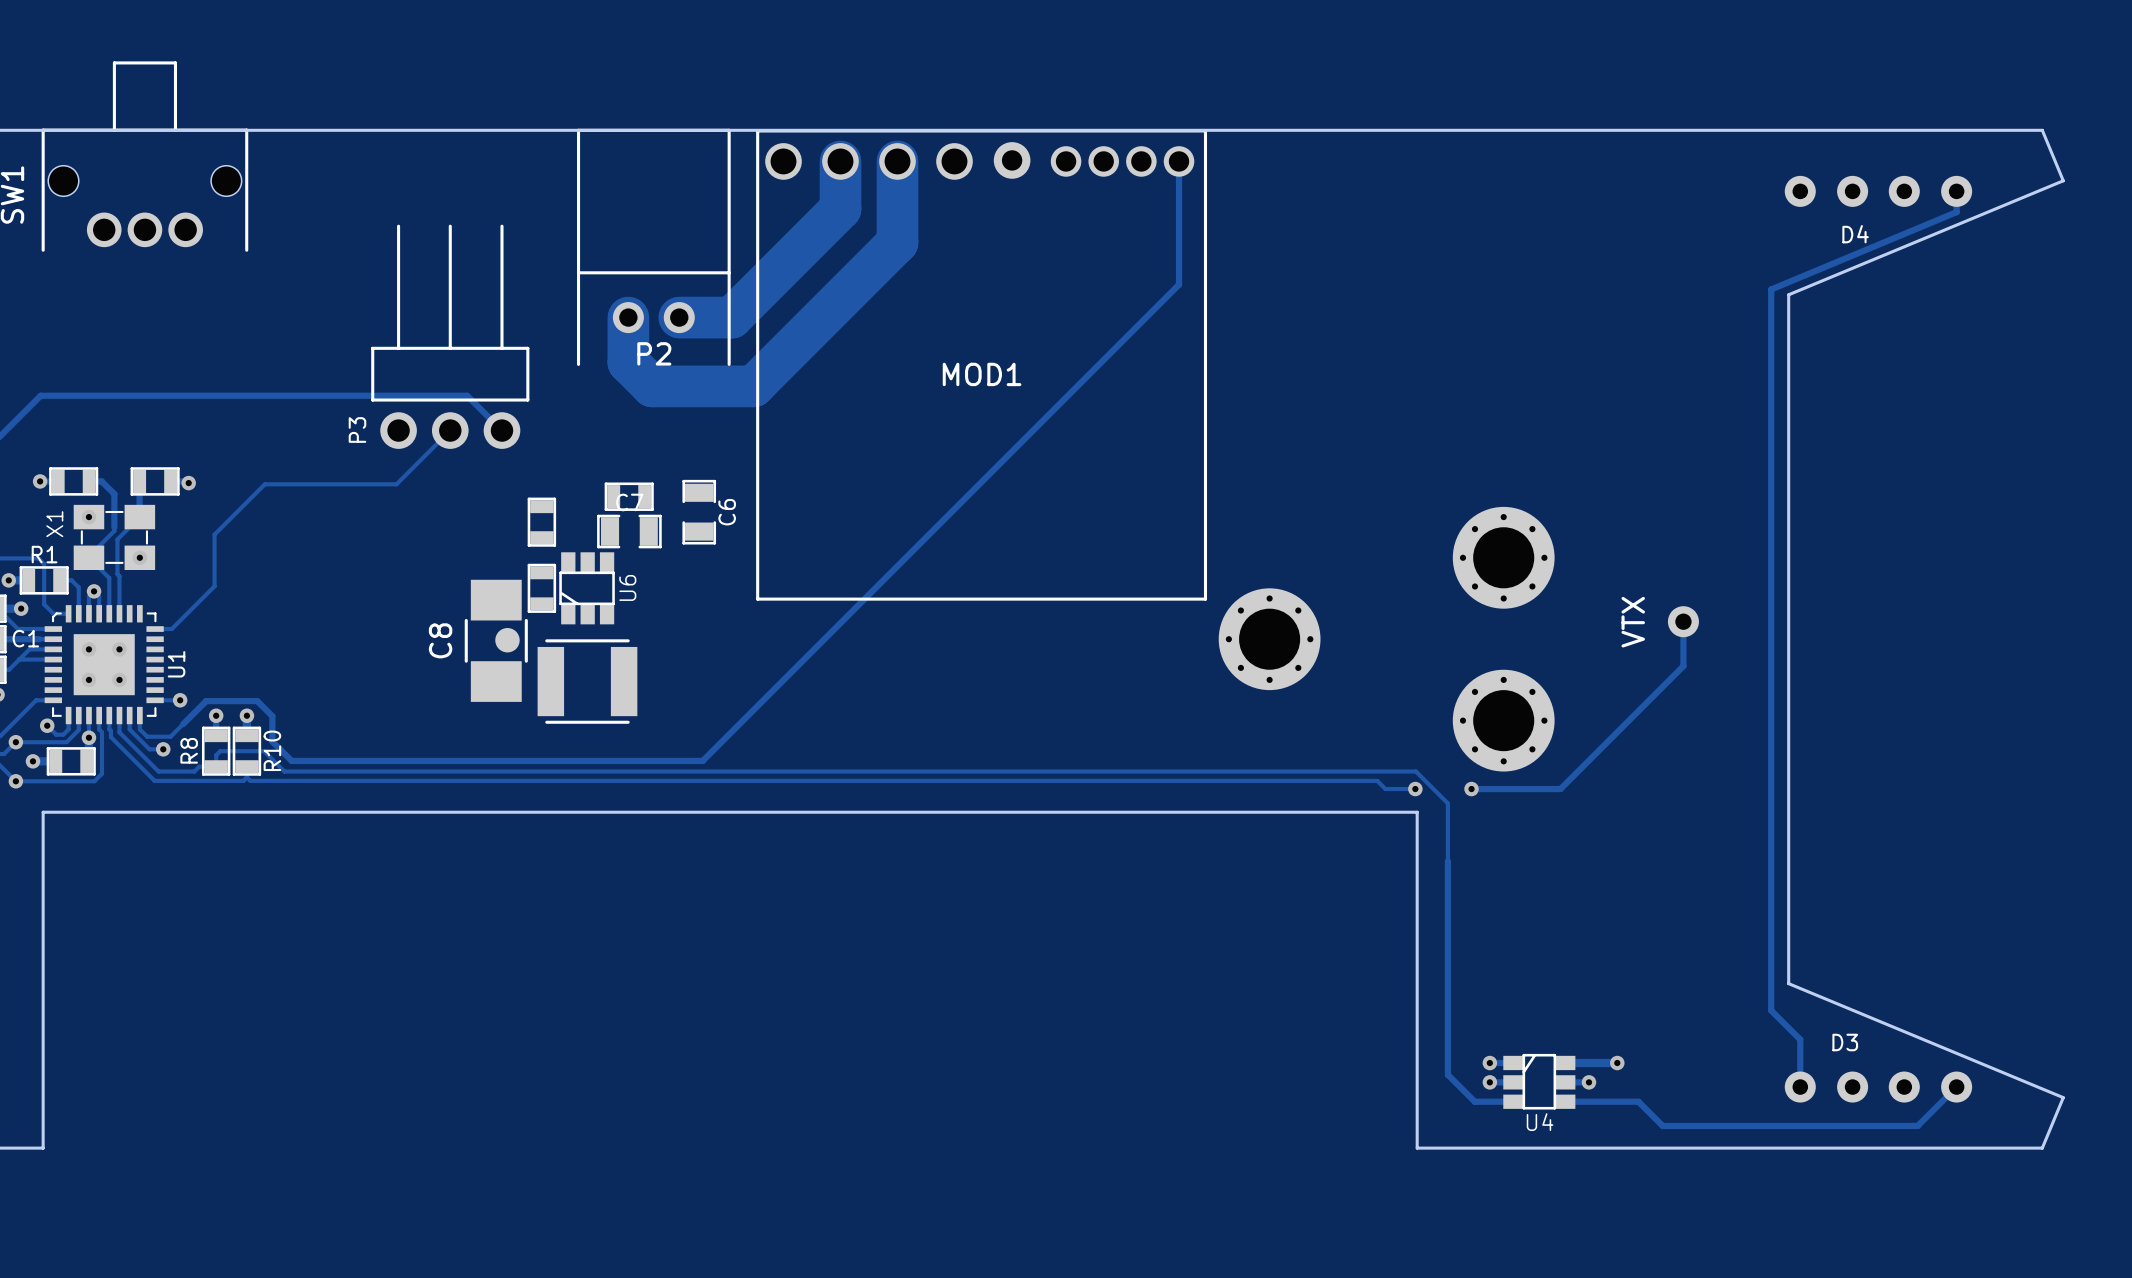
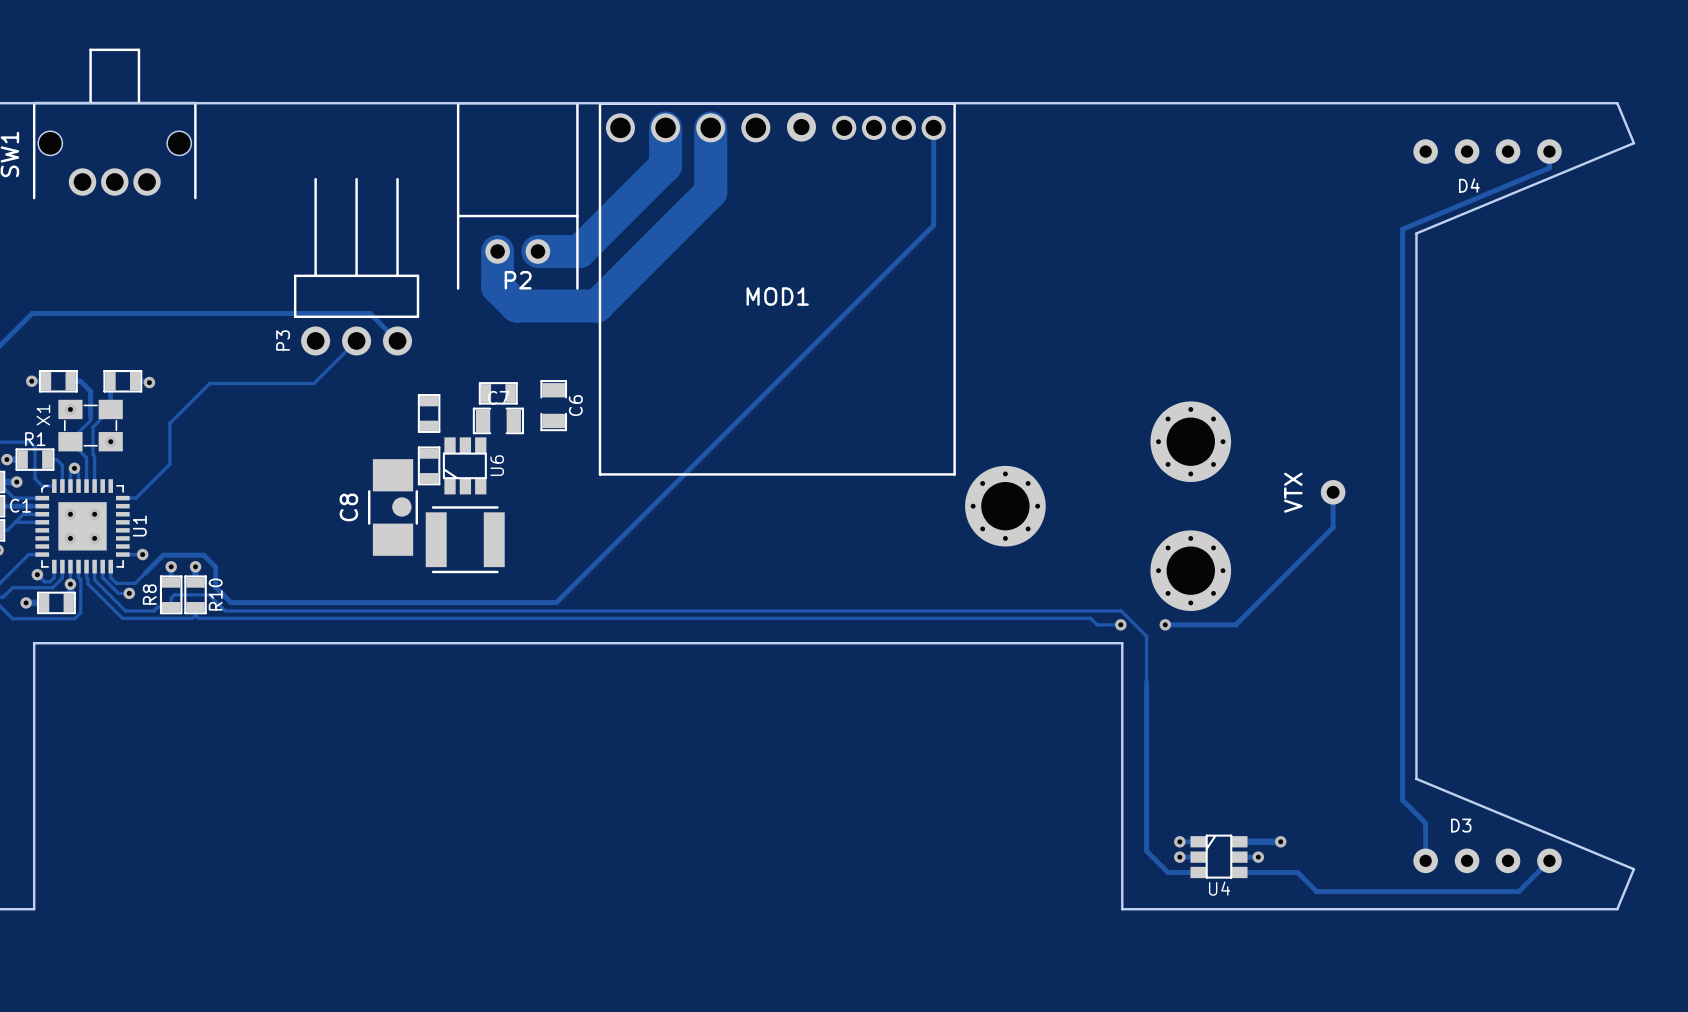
via: (15, 742) -> none
via: (15, 781) -> none

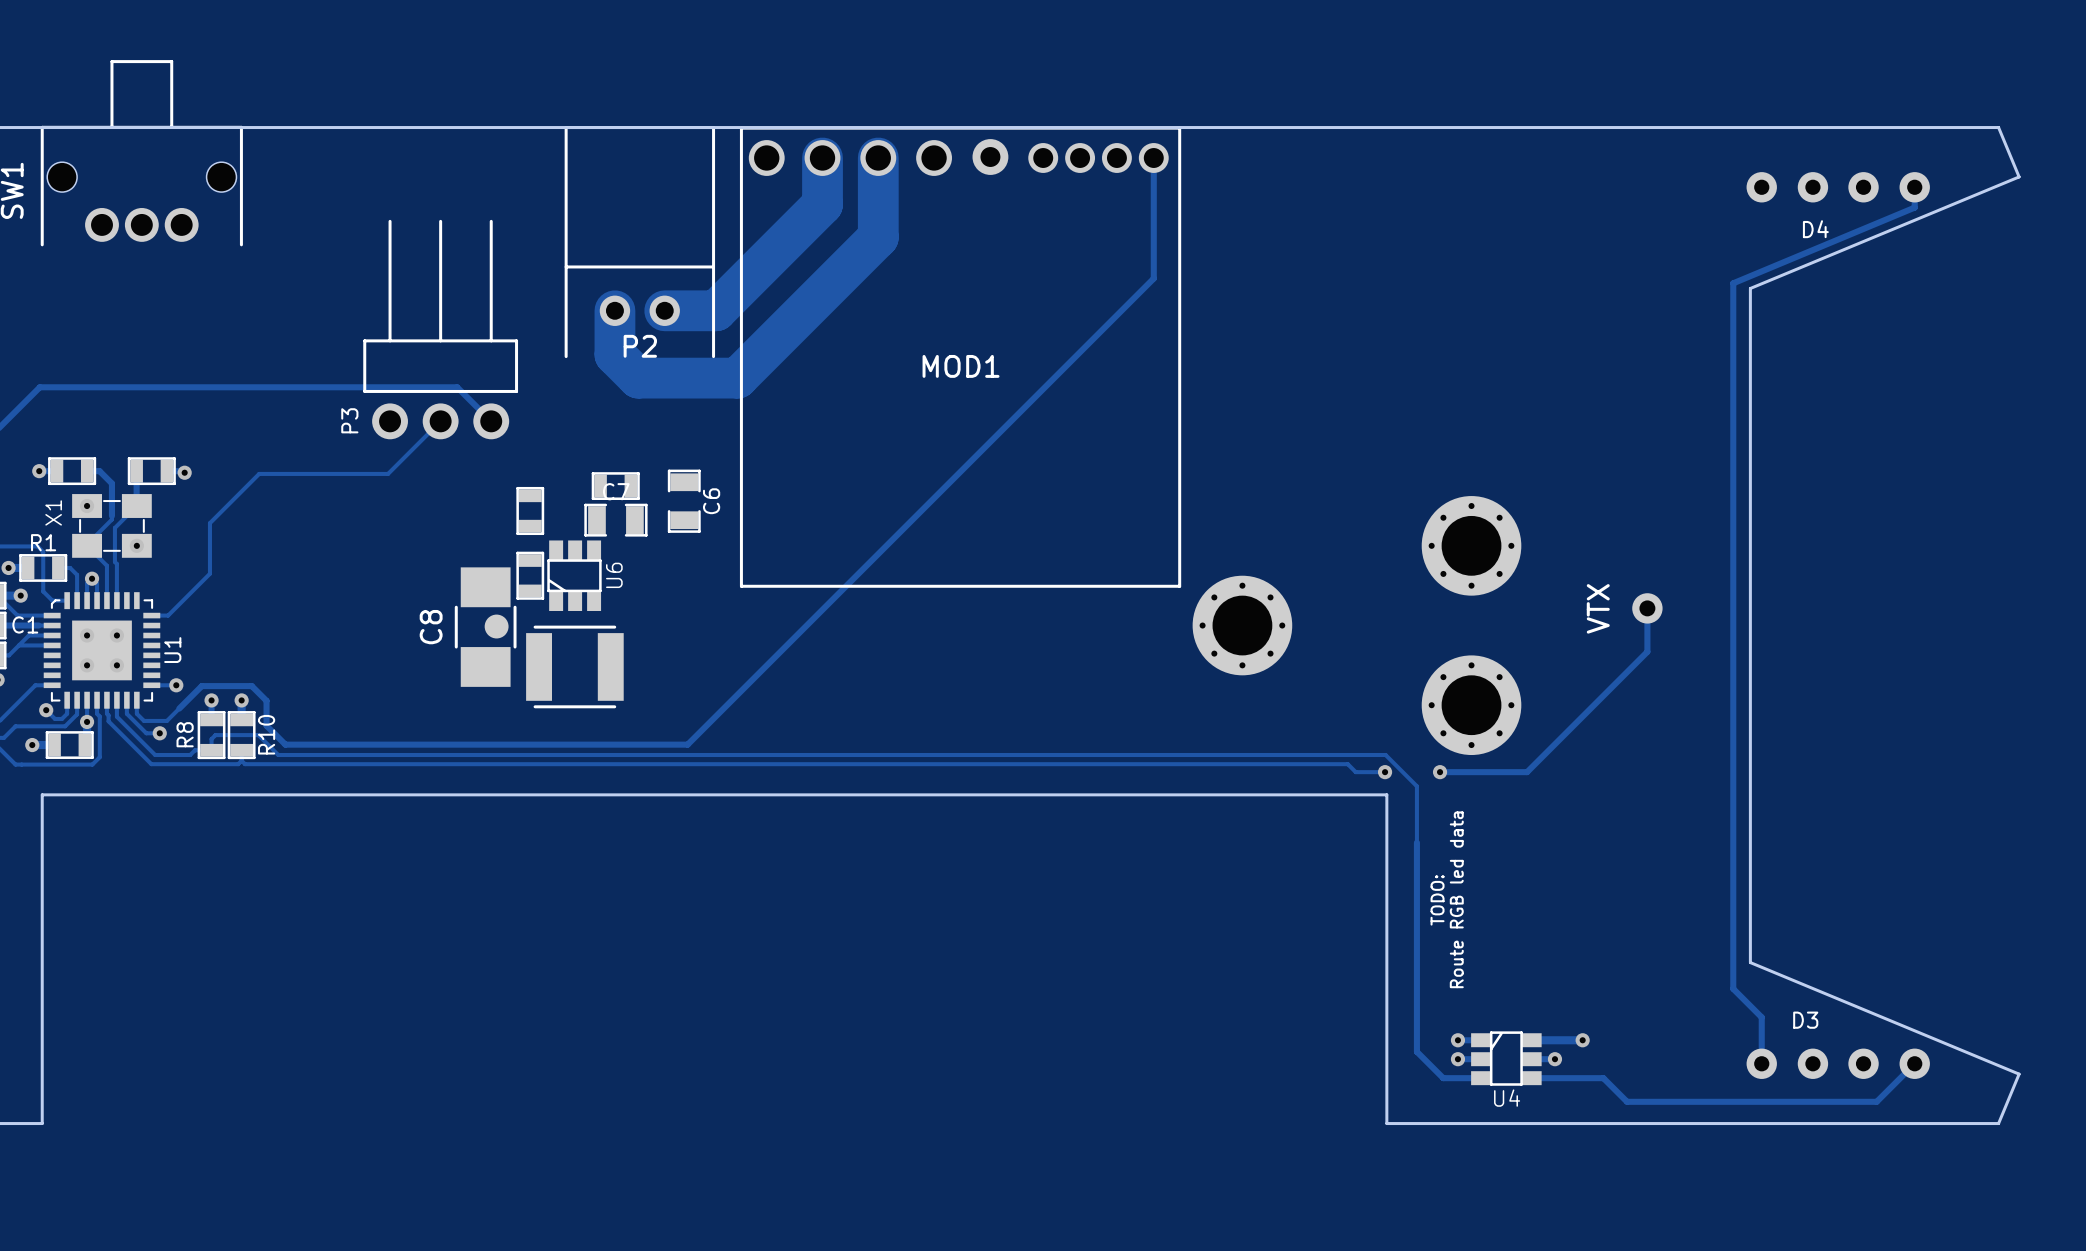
text: none -> TODO: (1437, 900)
text: none -> Route RGB led data (1456, 899)

